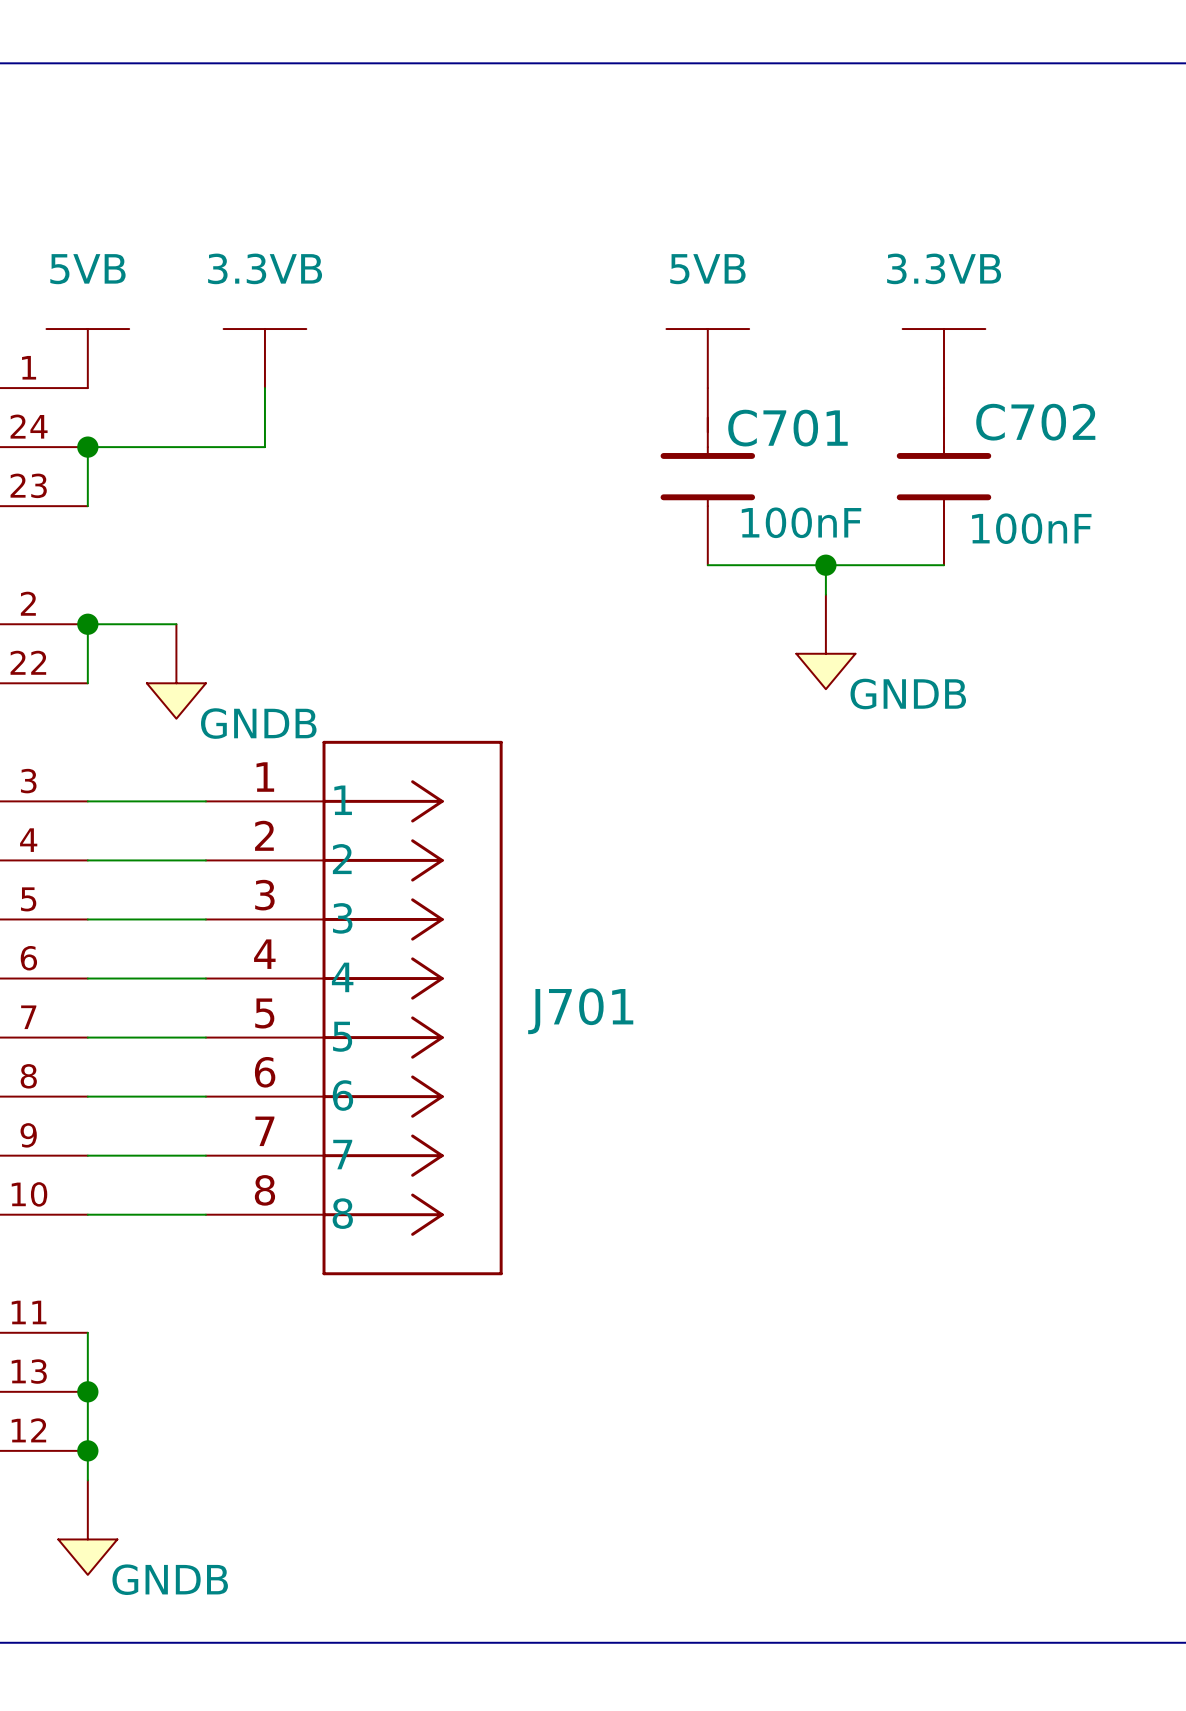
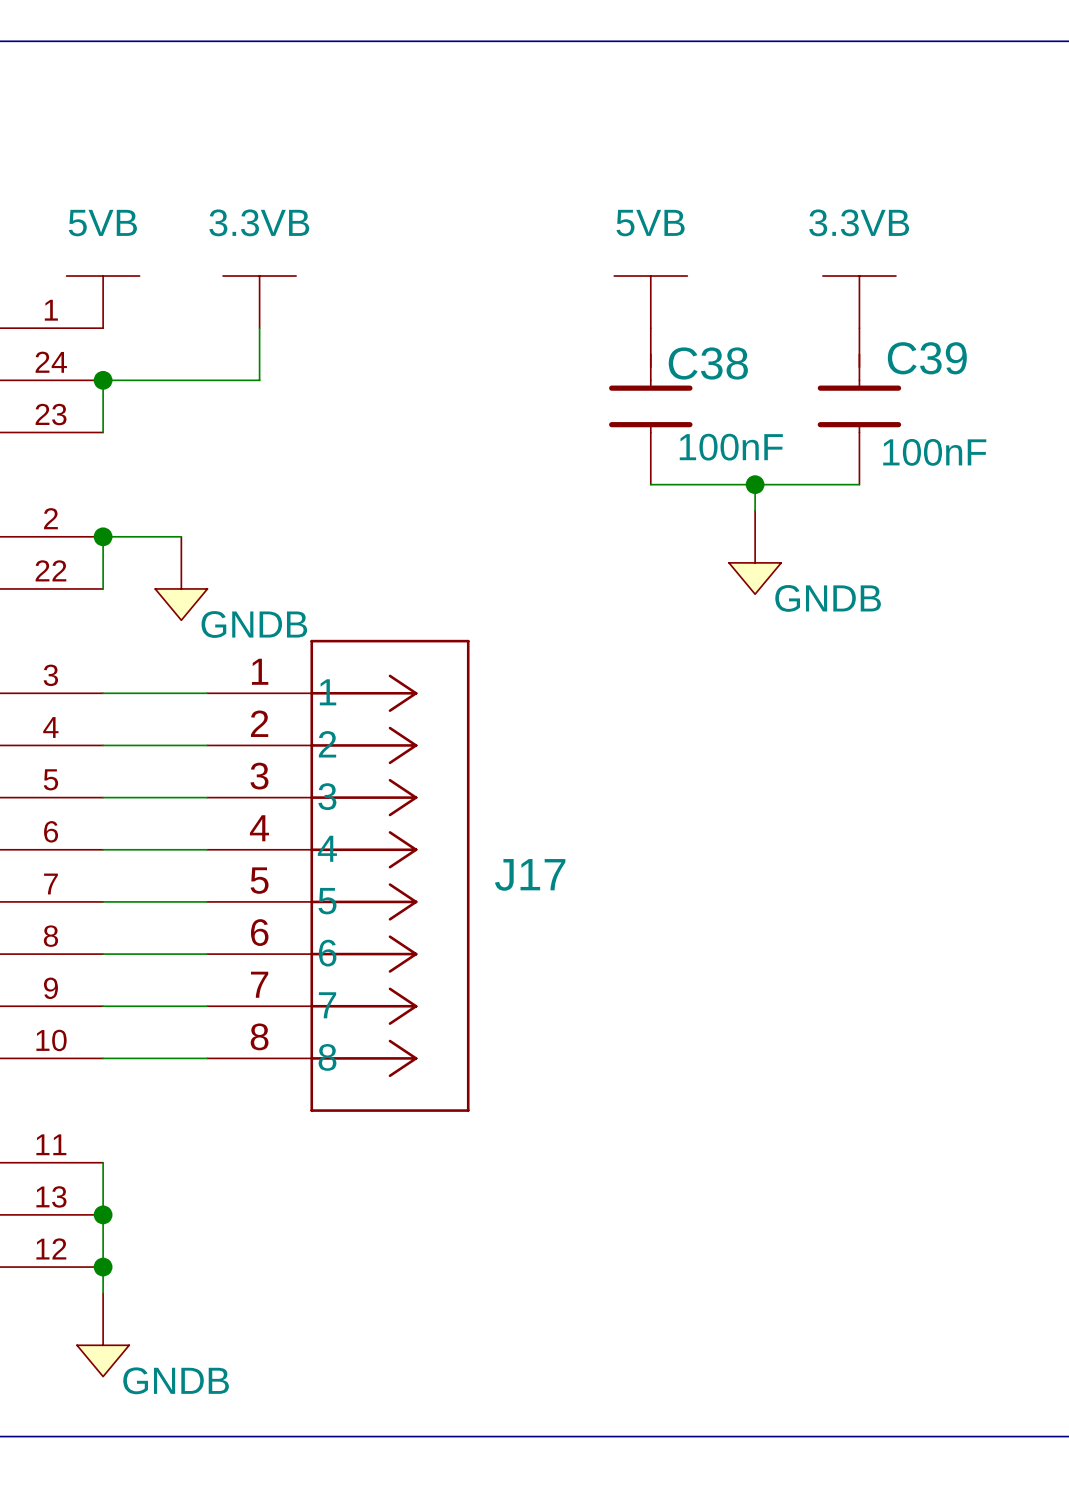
C702 name: C702 (1035, 422) -> C39 (927, 358)
C701 name: C701 (787, 428) -> C38 (708, 363)
J701 name: J701 (580, 1011) -> J17 (530, 874)

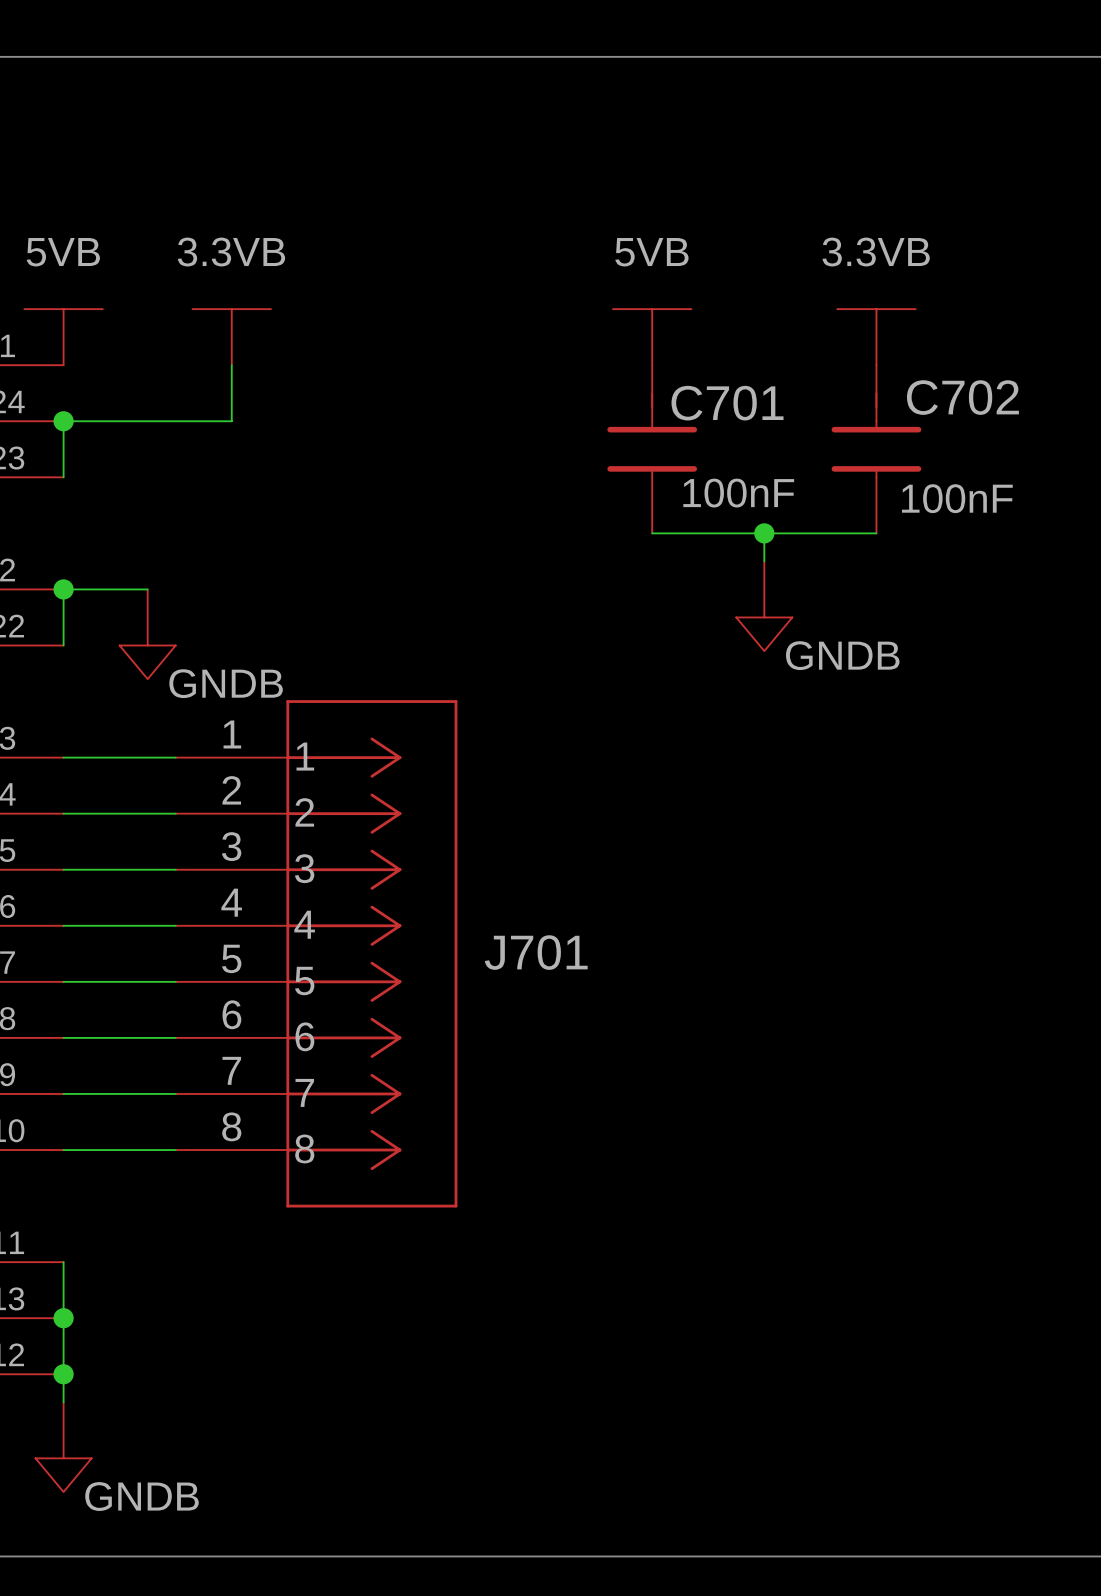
C39 name: C39 (927, 358) -> C702 (962, 397)
C38 name: C38 (708, 363) -> C701 (727, 403)
J17 name: J17 (530, 874) -> J701 (536, 952)

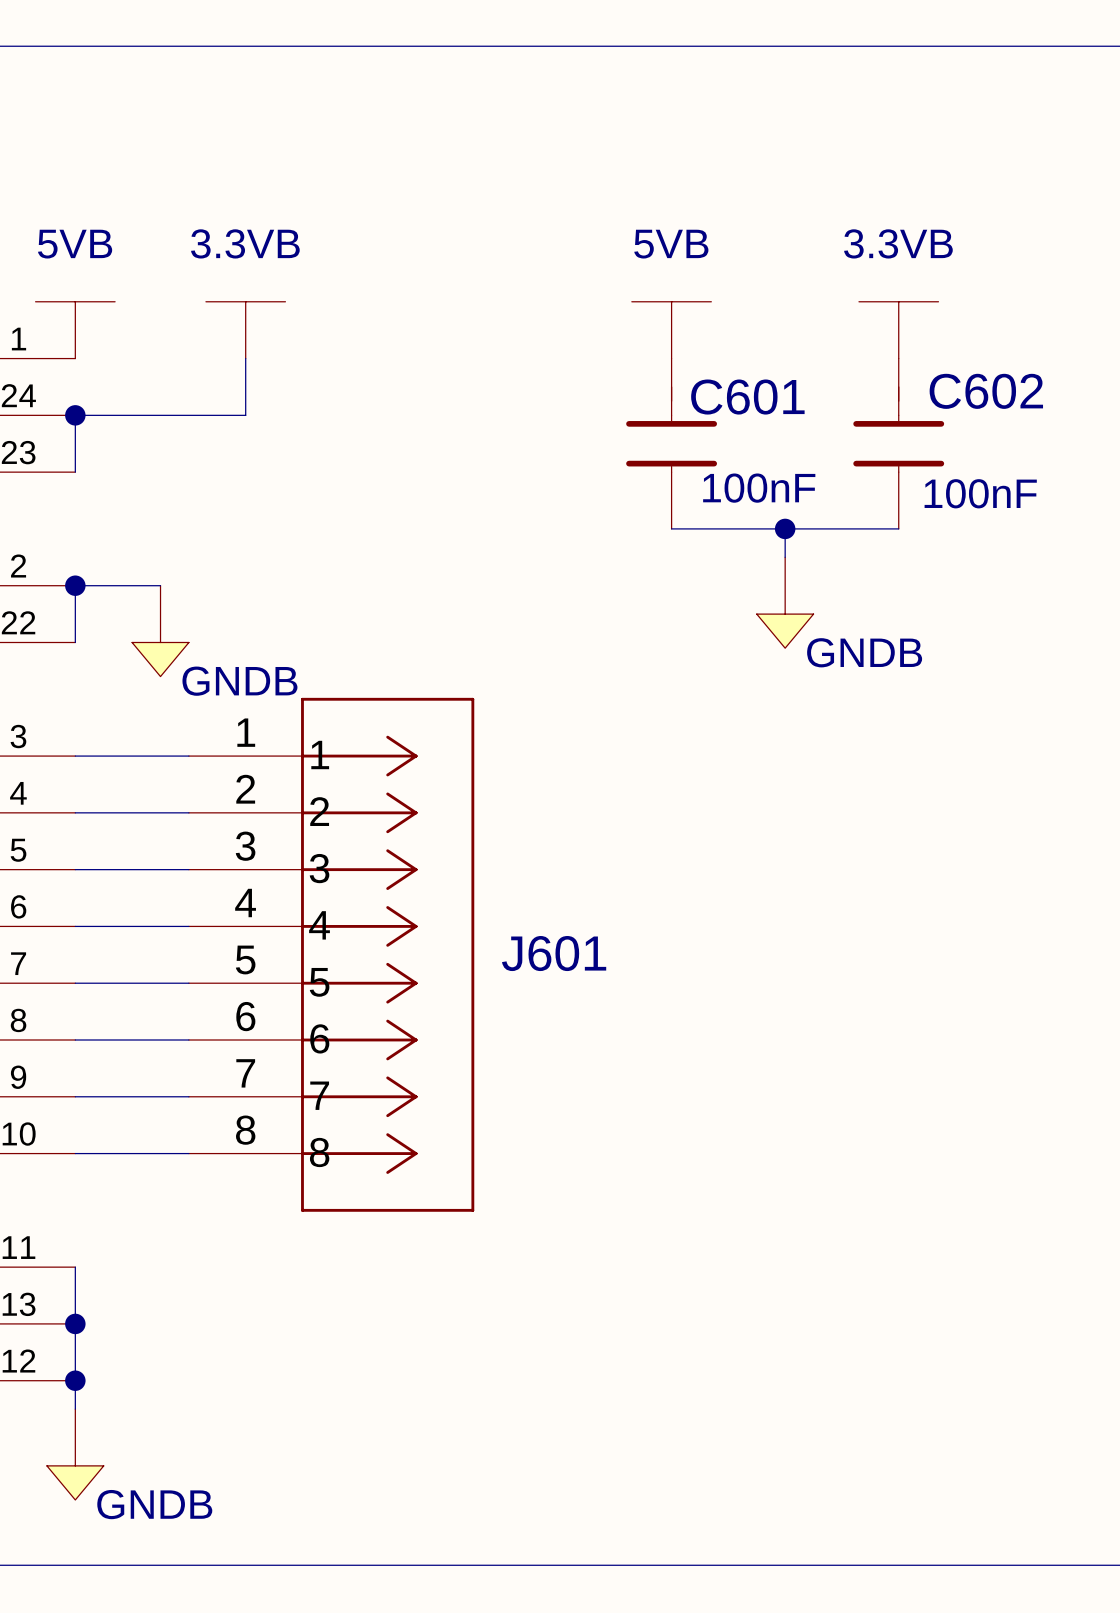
C702 name: C702 (962, 397) -> C602 (986, 391)
C701 name: C701 (727, 403) -> C601 (747, 397)
J701 name: J701 (536, 952) -> J601 (554, 953)

